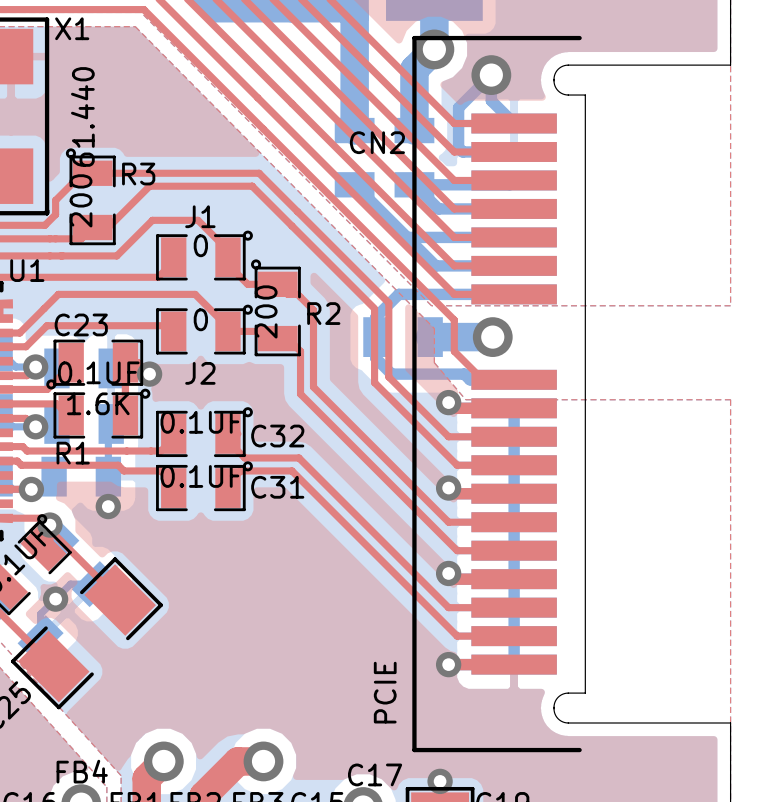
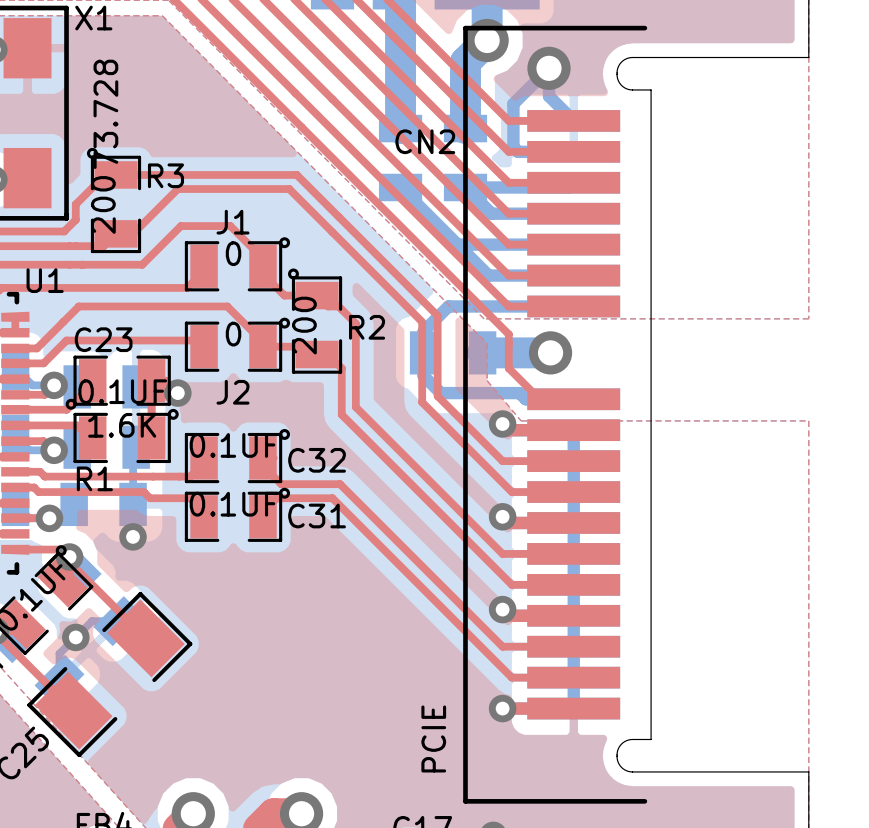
X1 value: 61.440 (82, 116) -> 73.728 (105, 114)

